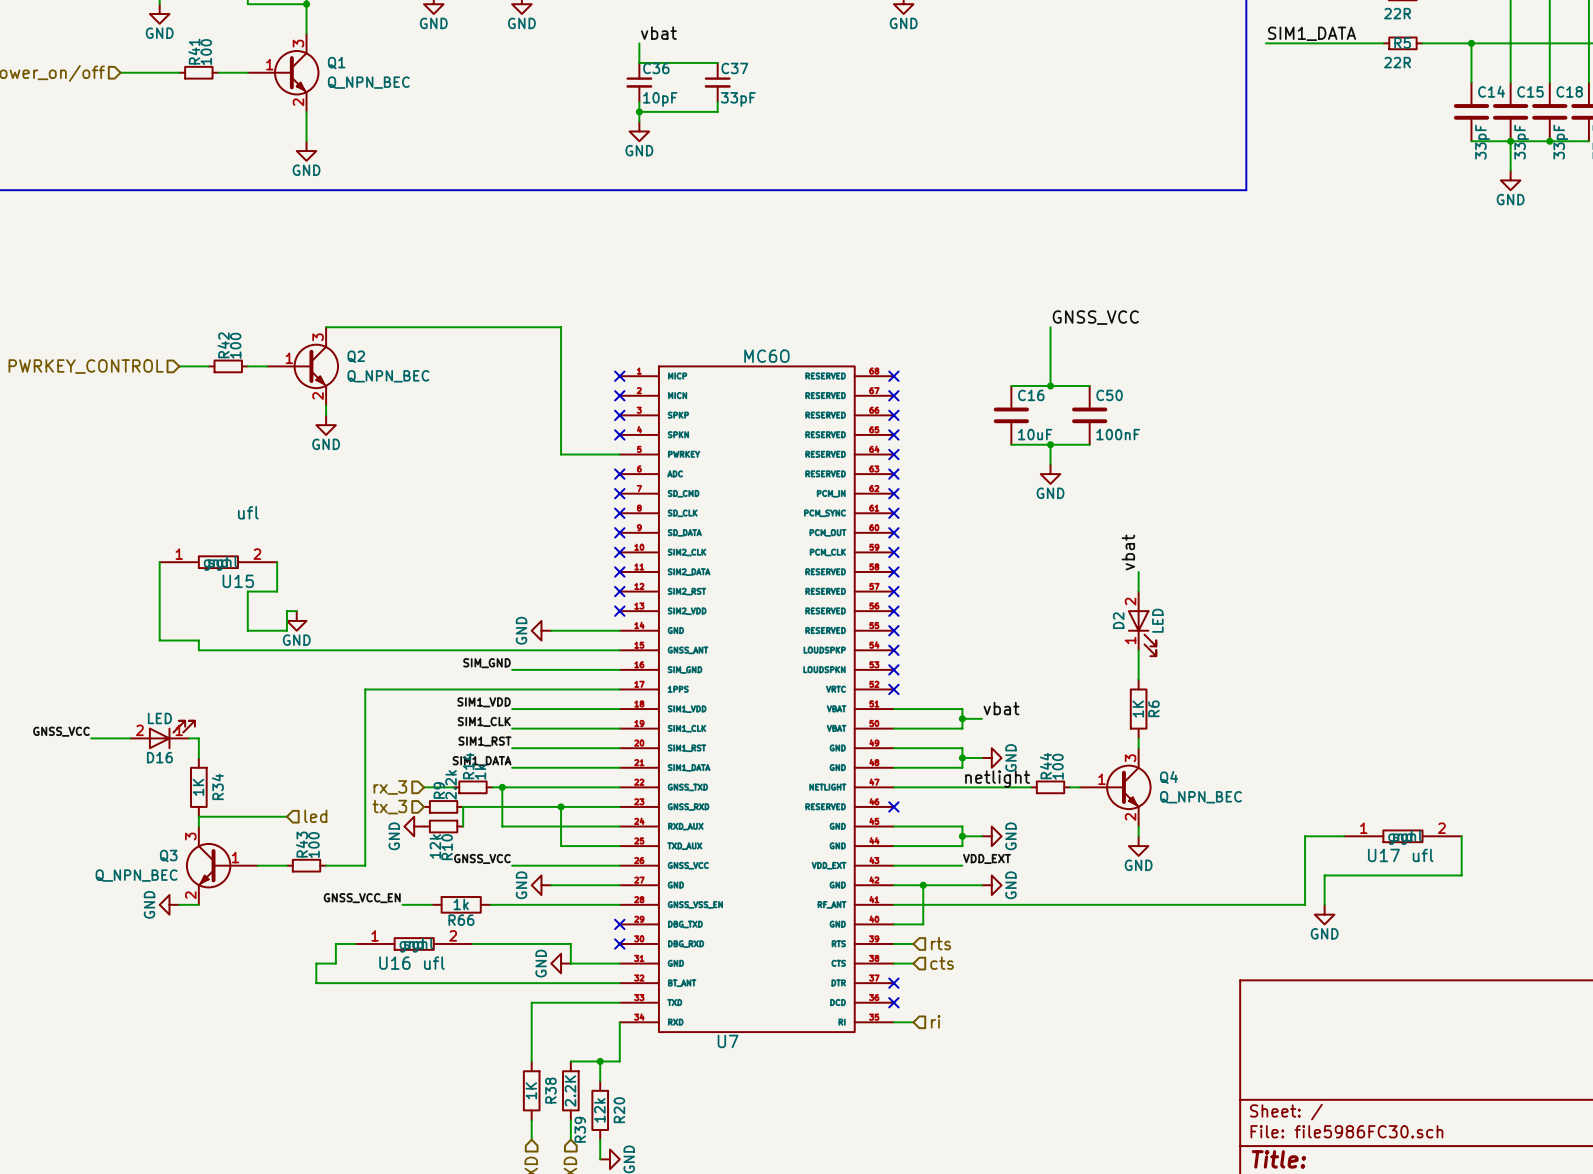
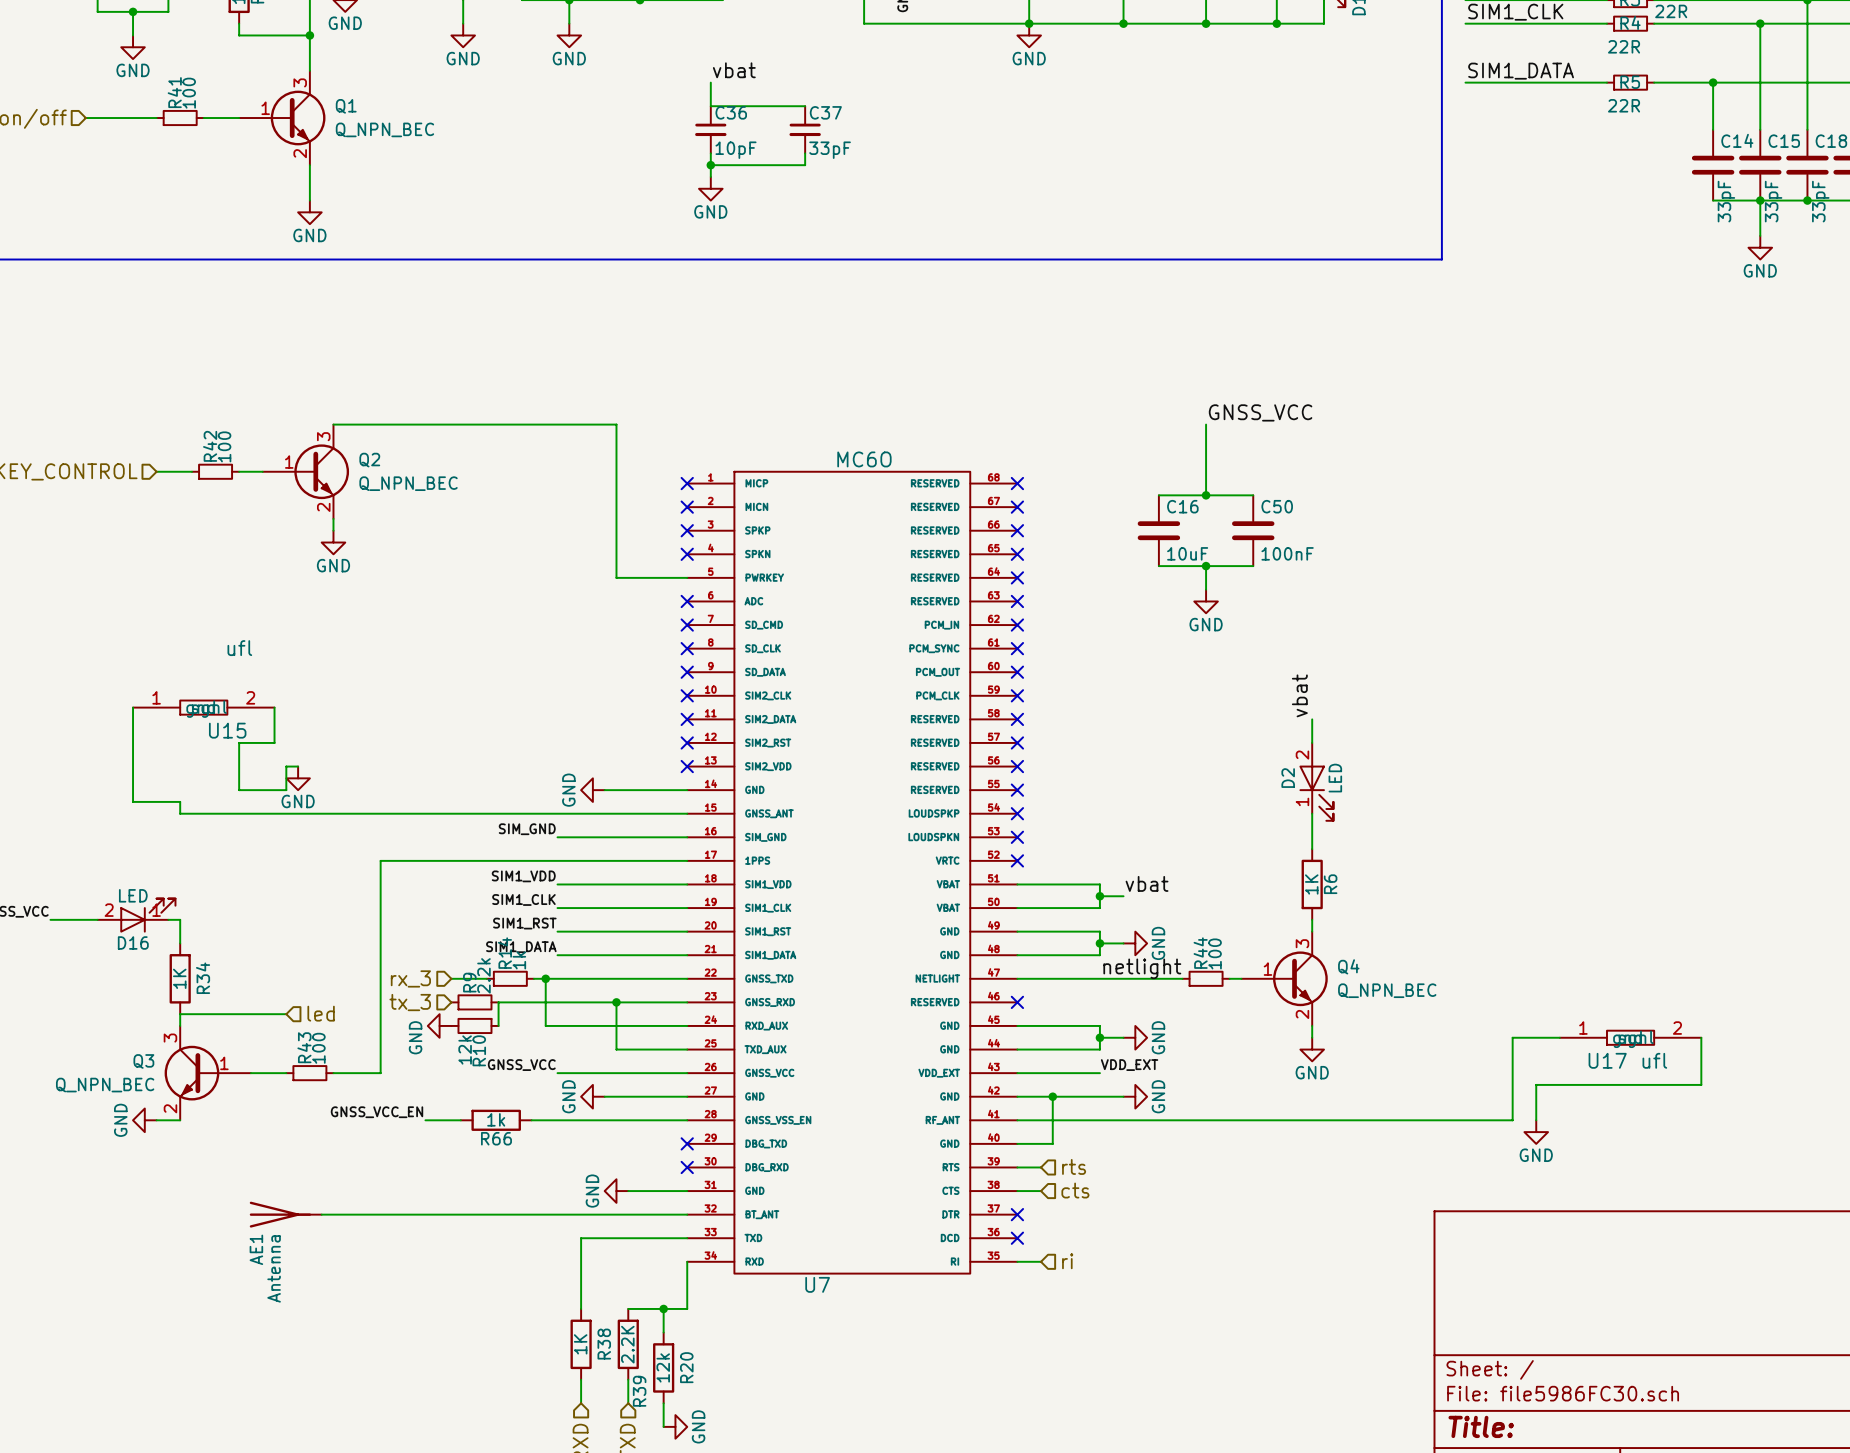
wire: (355, 943) (335, 943) (335, 963) (316, 963) (316, 983) -> none
U16: ufl (414, 943) -> none
wire: (472, 943) (570, 943) (570, 963) -> none
AE1: none -> Antenna (285, 1214)

